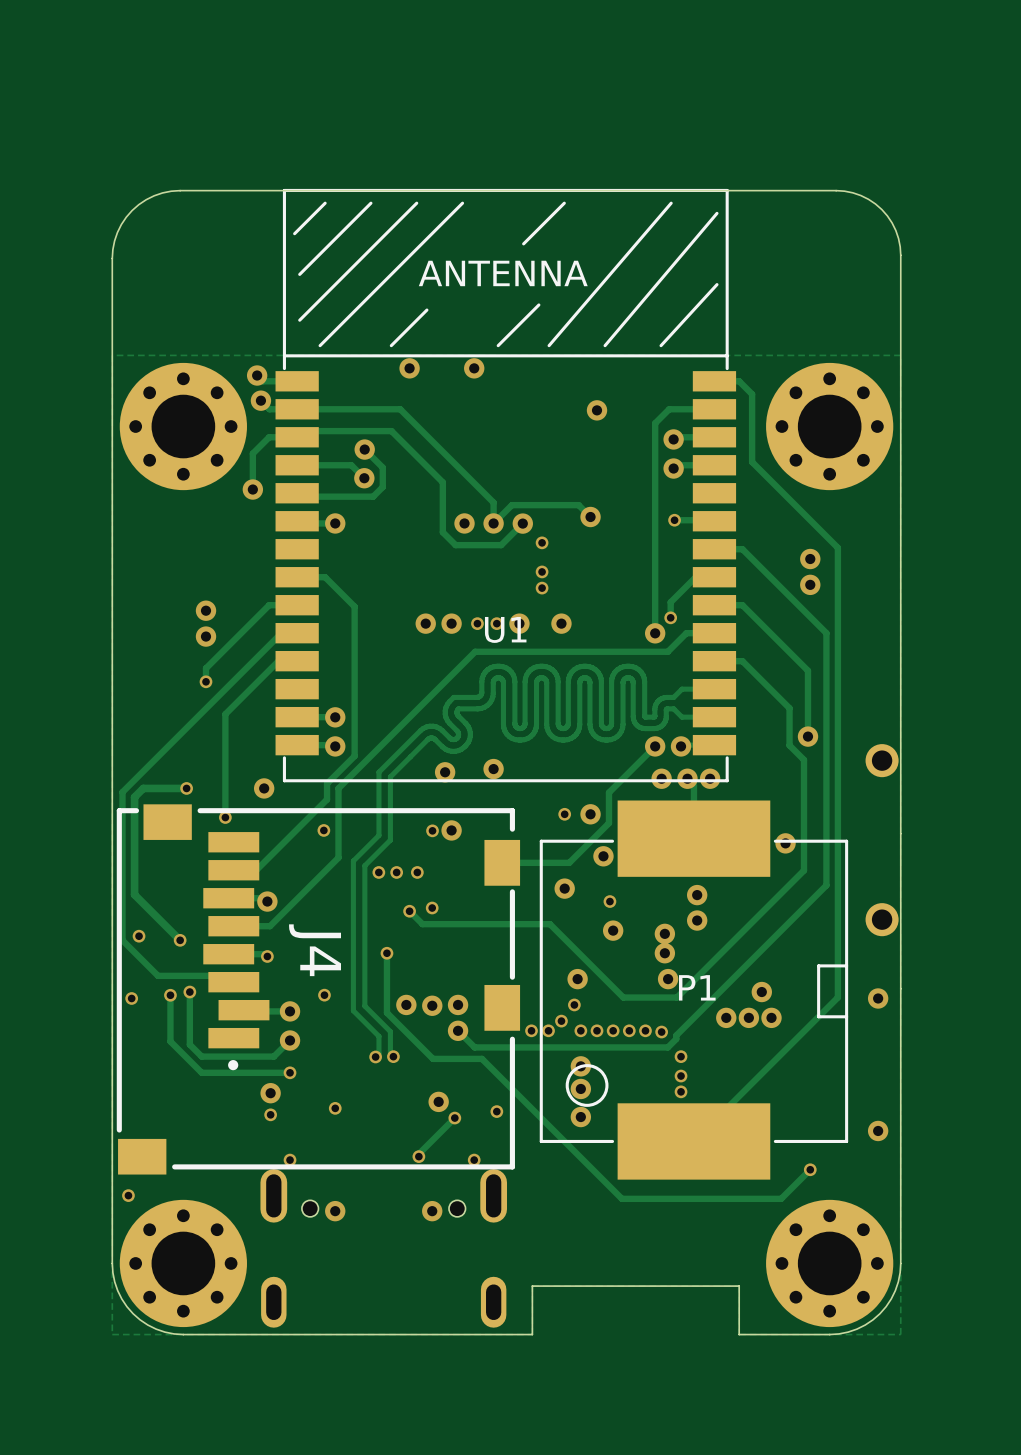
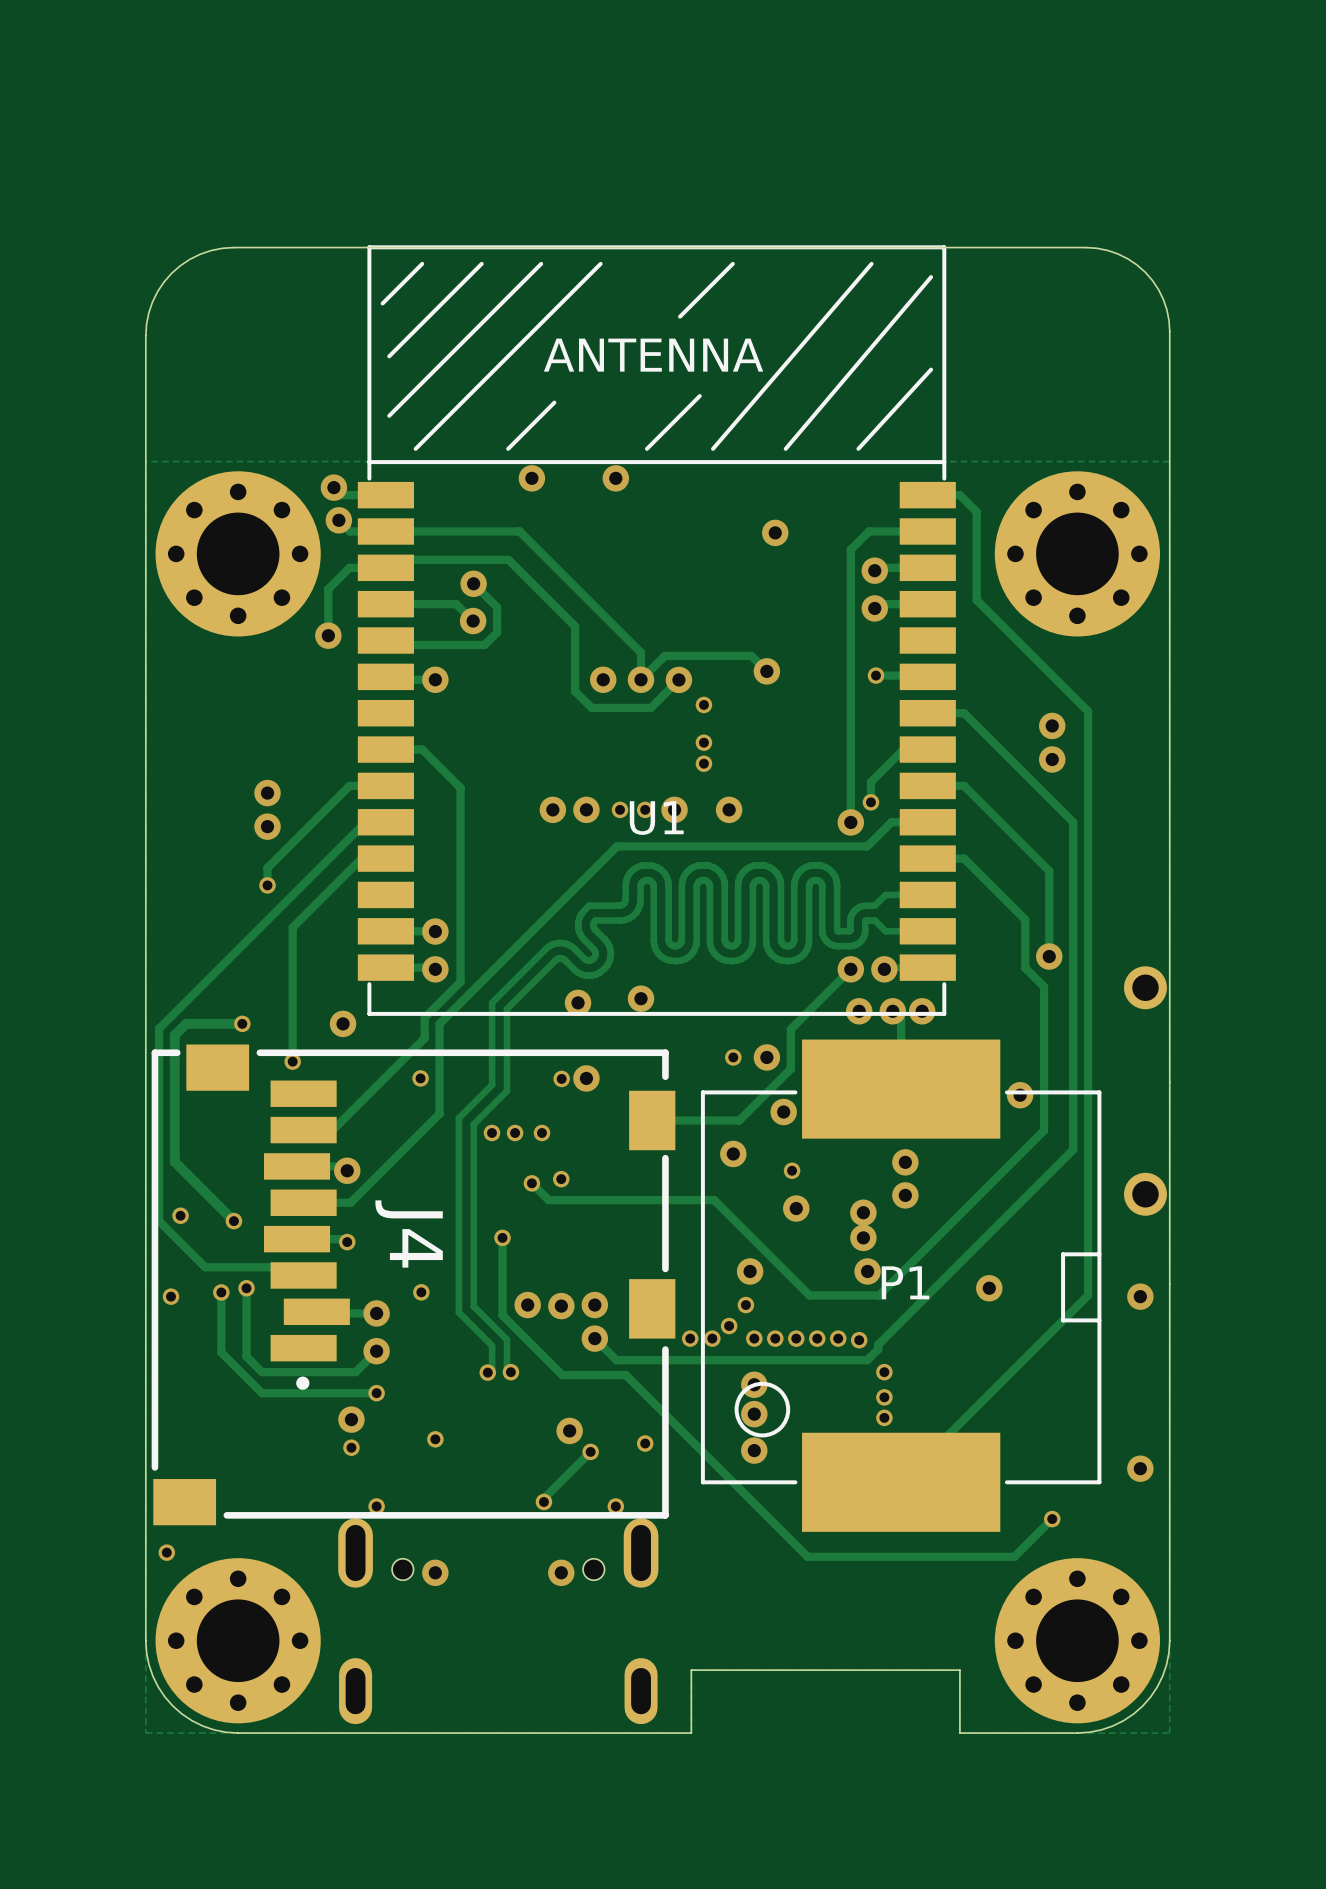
via: (726, 1017) -> none
via: (748, 1017) -> none
via: (771, 1017) -> none

